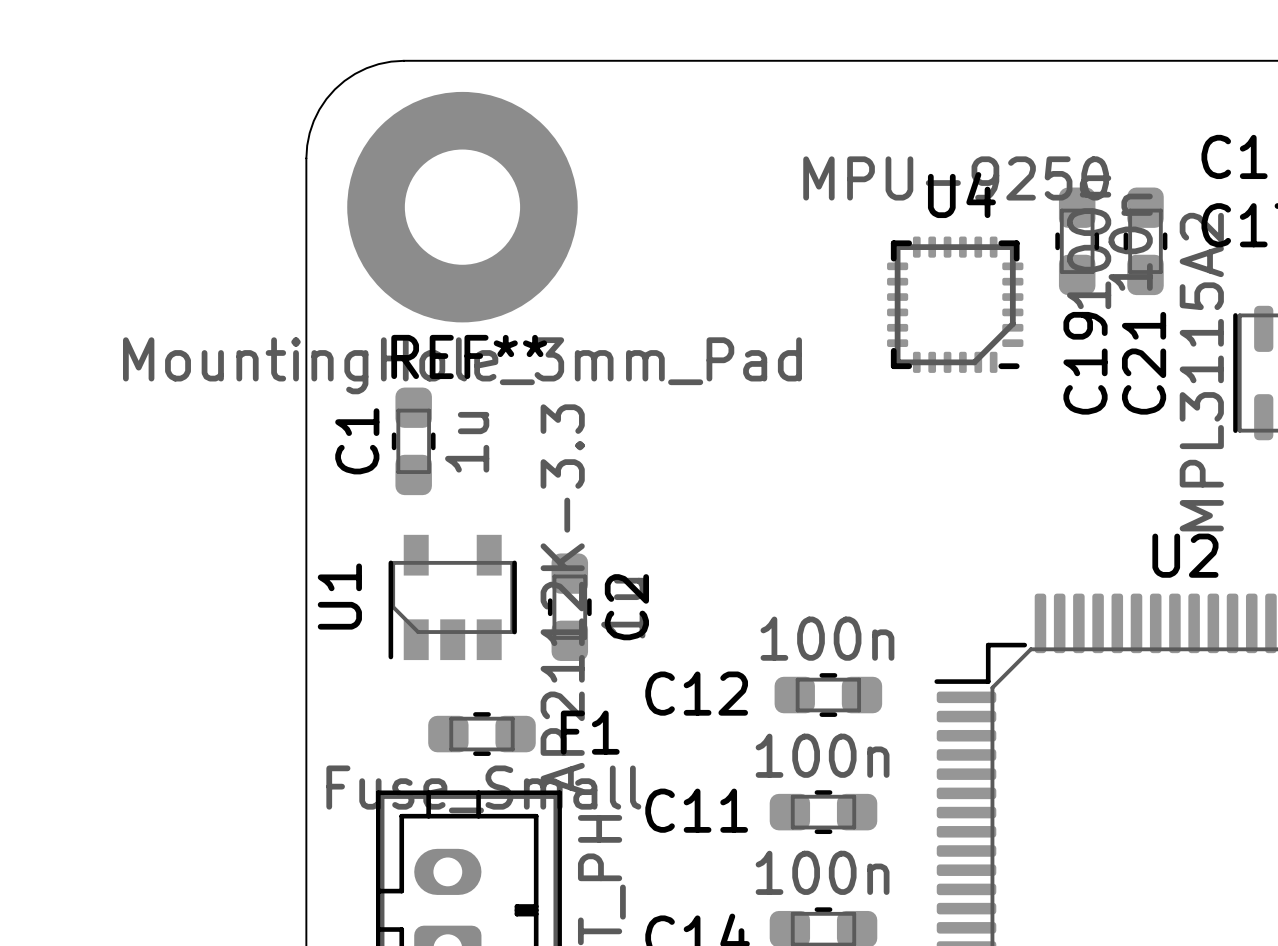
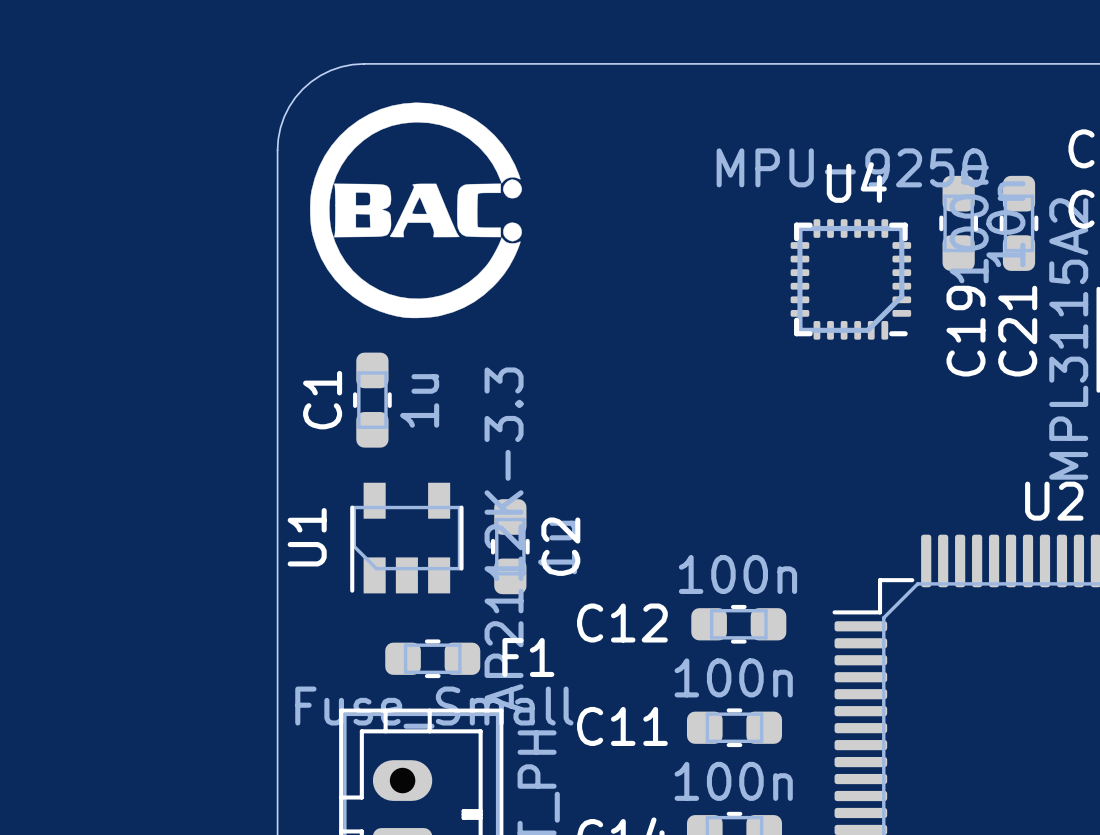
drawing: none -> [310, 102, 523, 319]
REF**: MountingHole_3mm_Pad (462, 207) -> none

